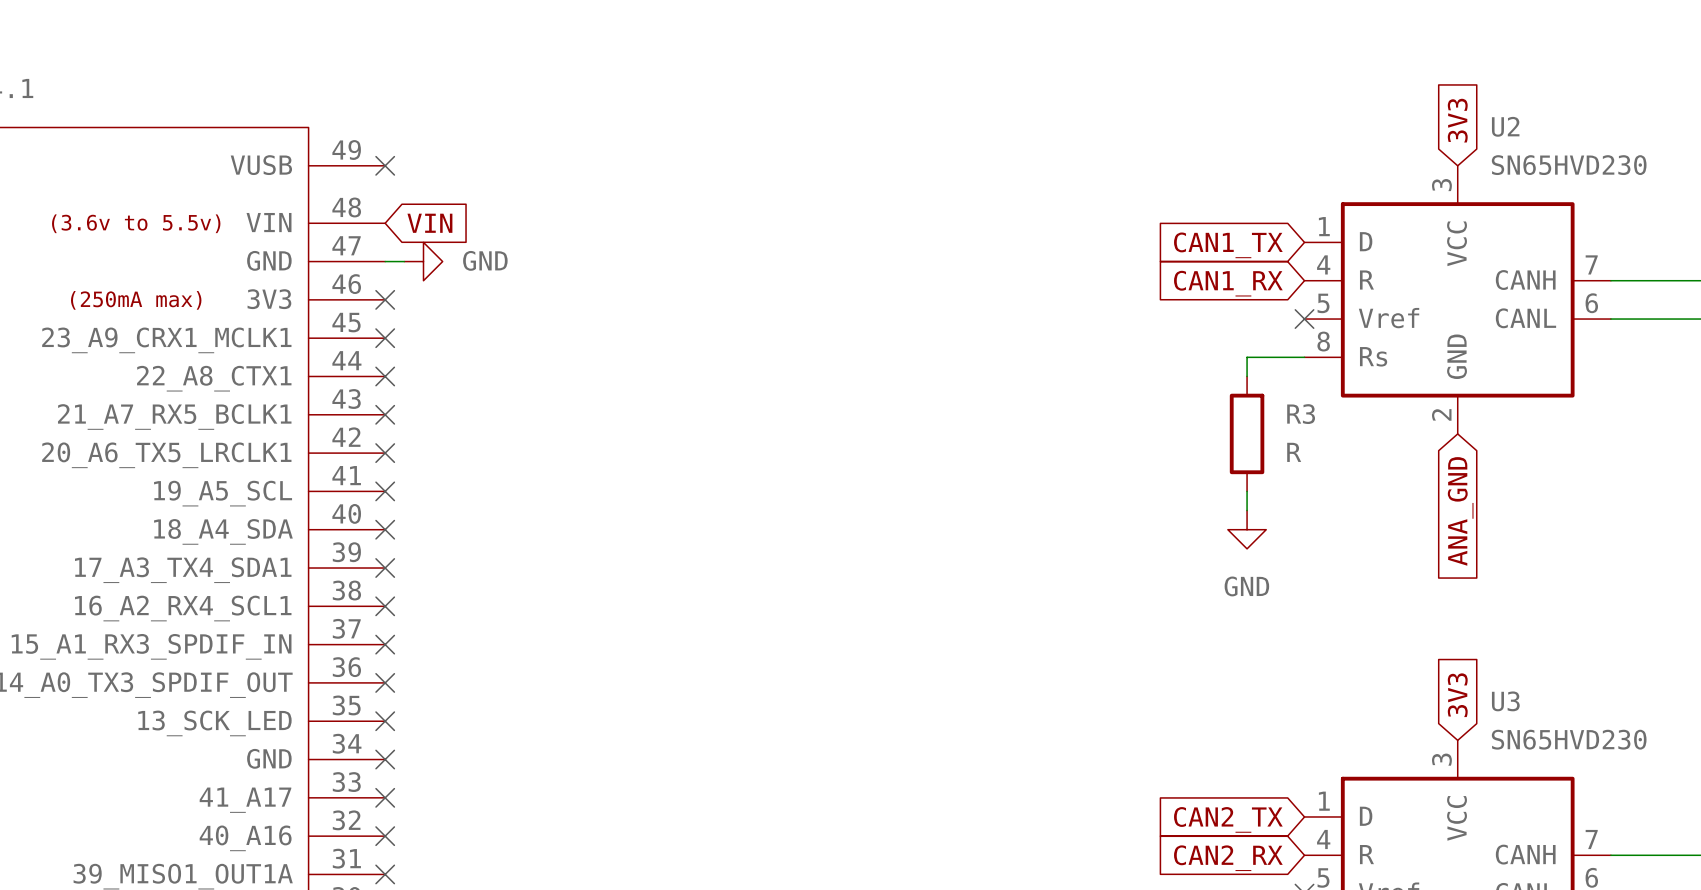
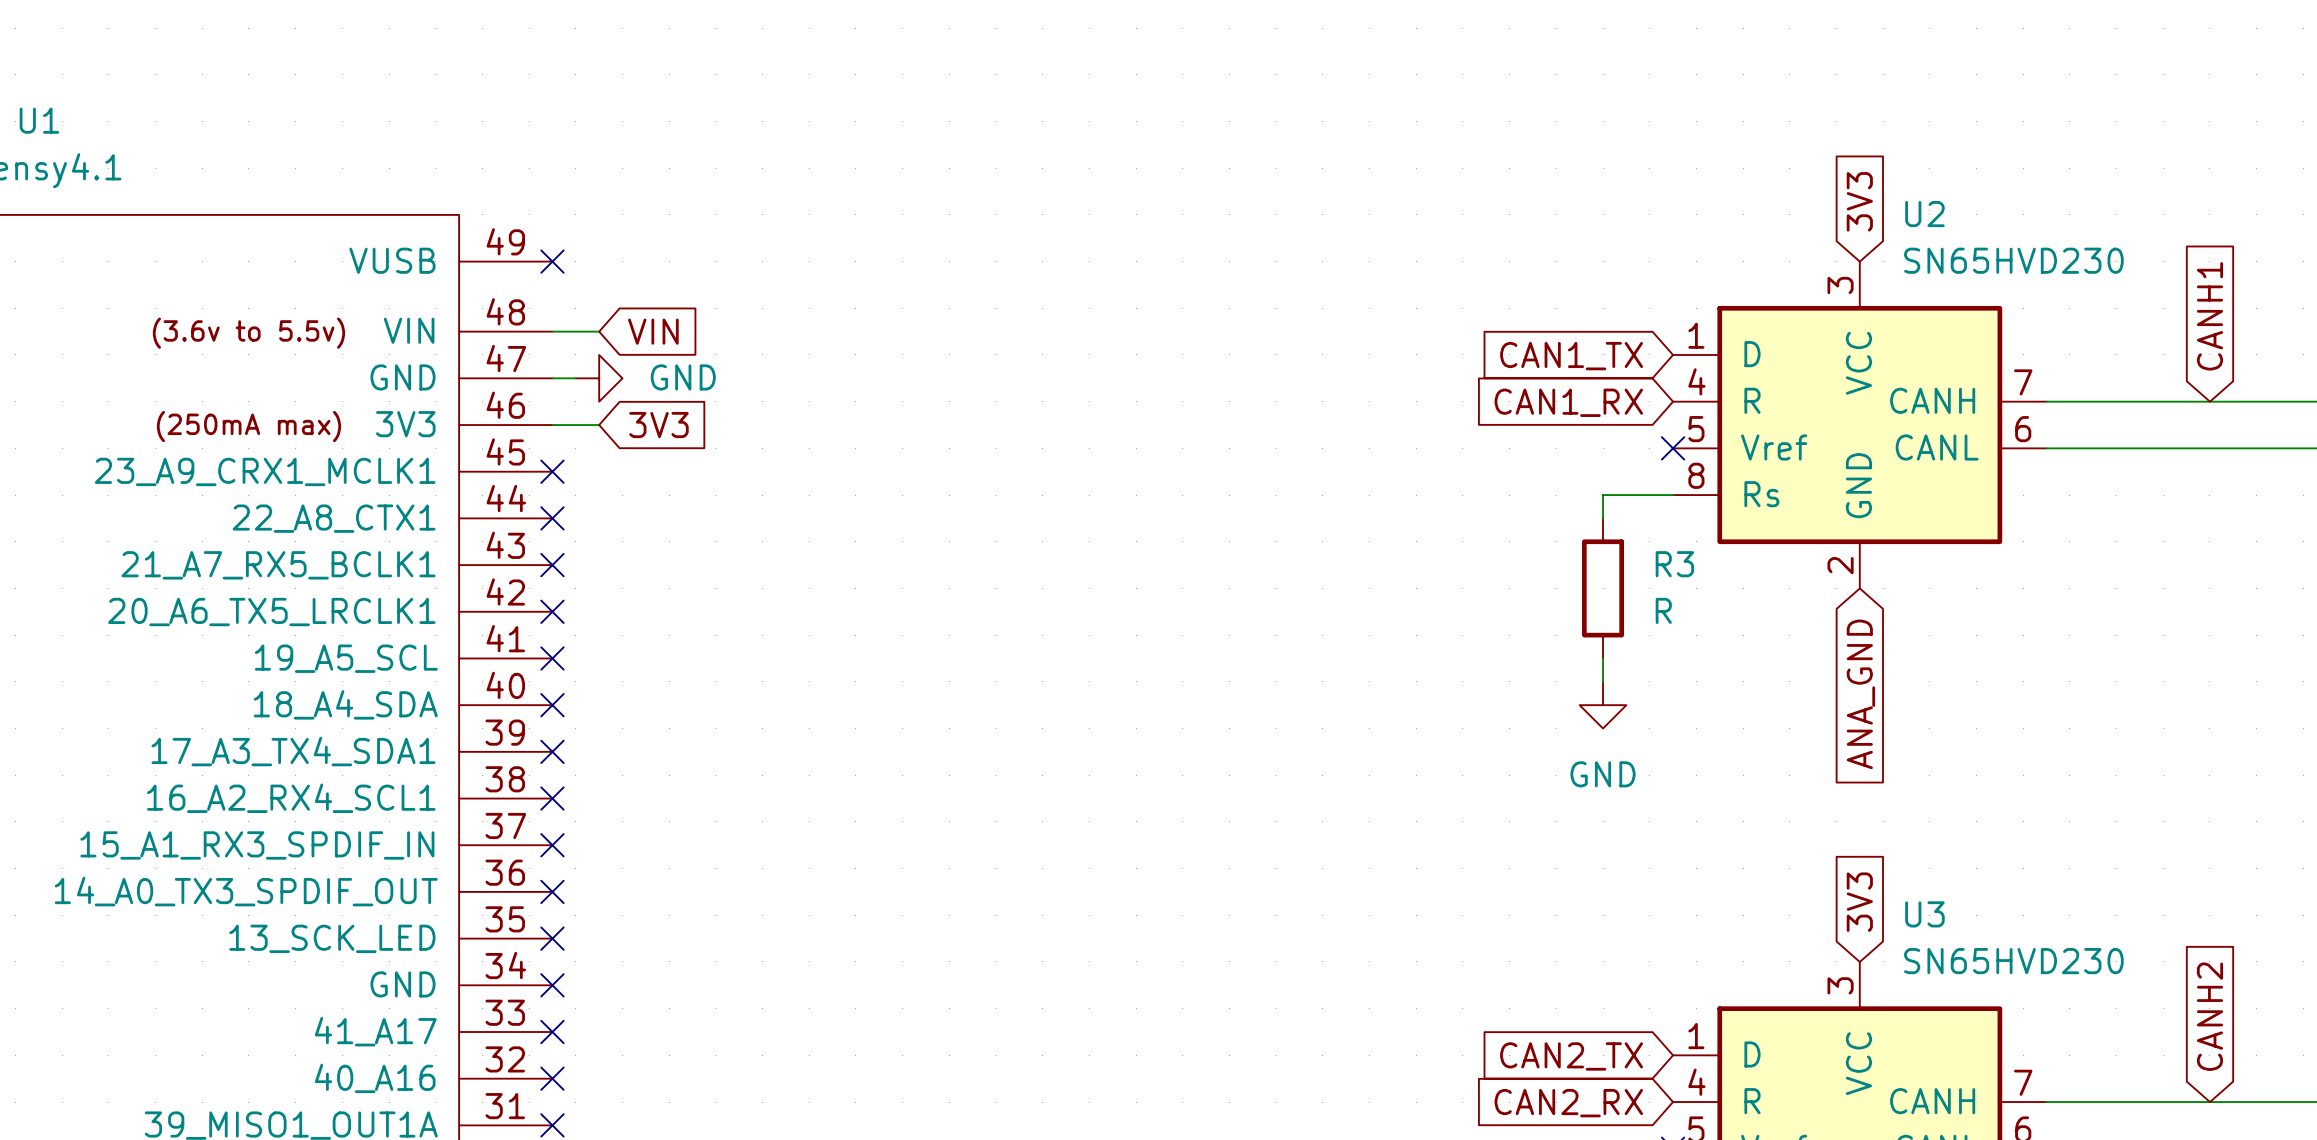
wire: none -> (552, 331) (599, 331)
global label position: VIN (429, 223) -> VIN (653, 331)
wire: none -> (552, 425) (599, 425)
no-connect mark: (385, 299) -> none
global label: none -> 3V3 (658, 425)

